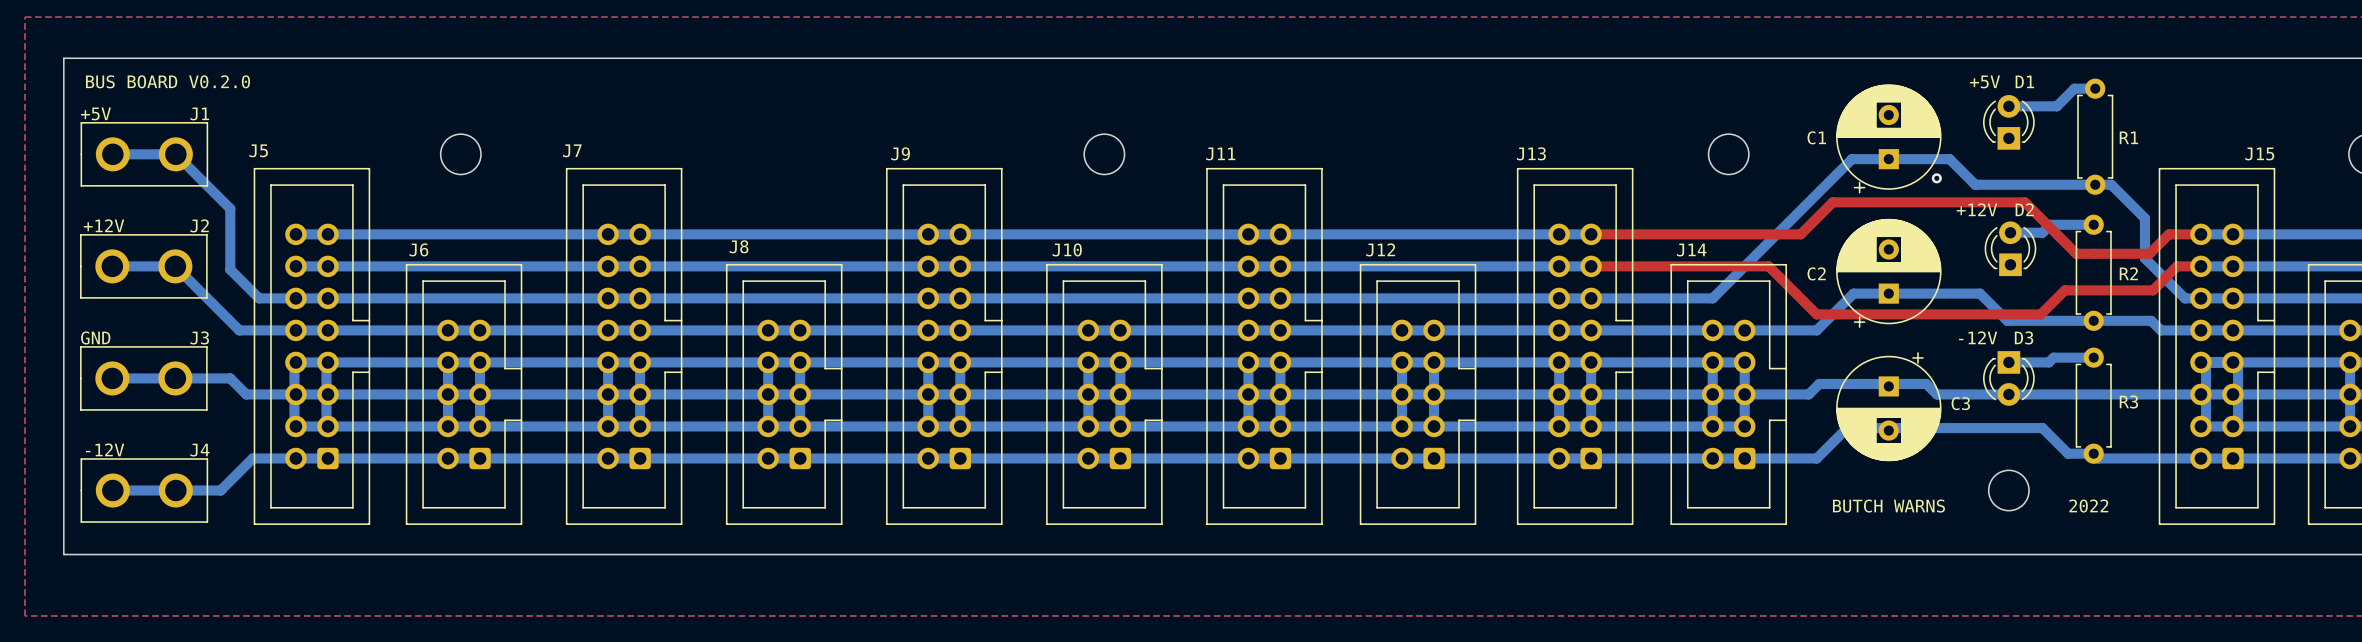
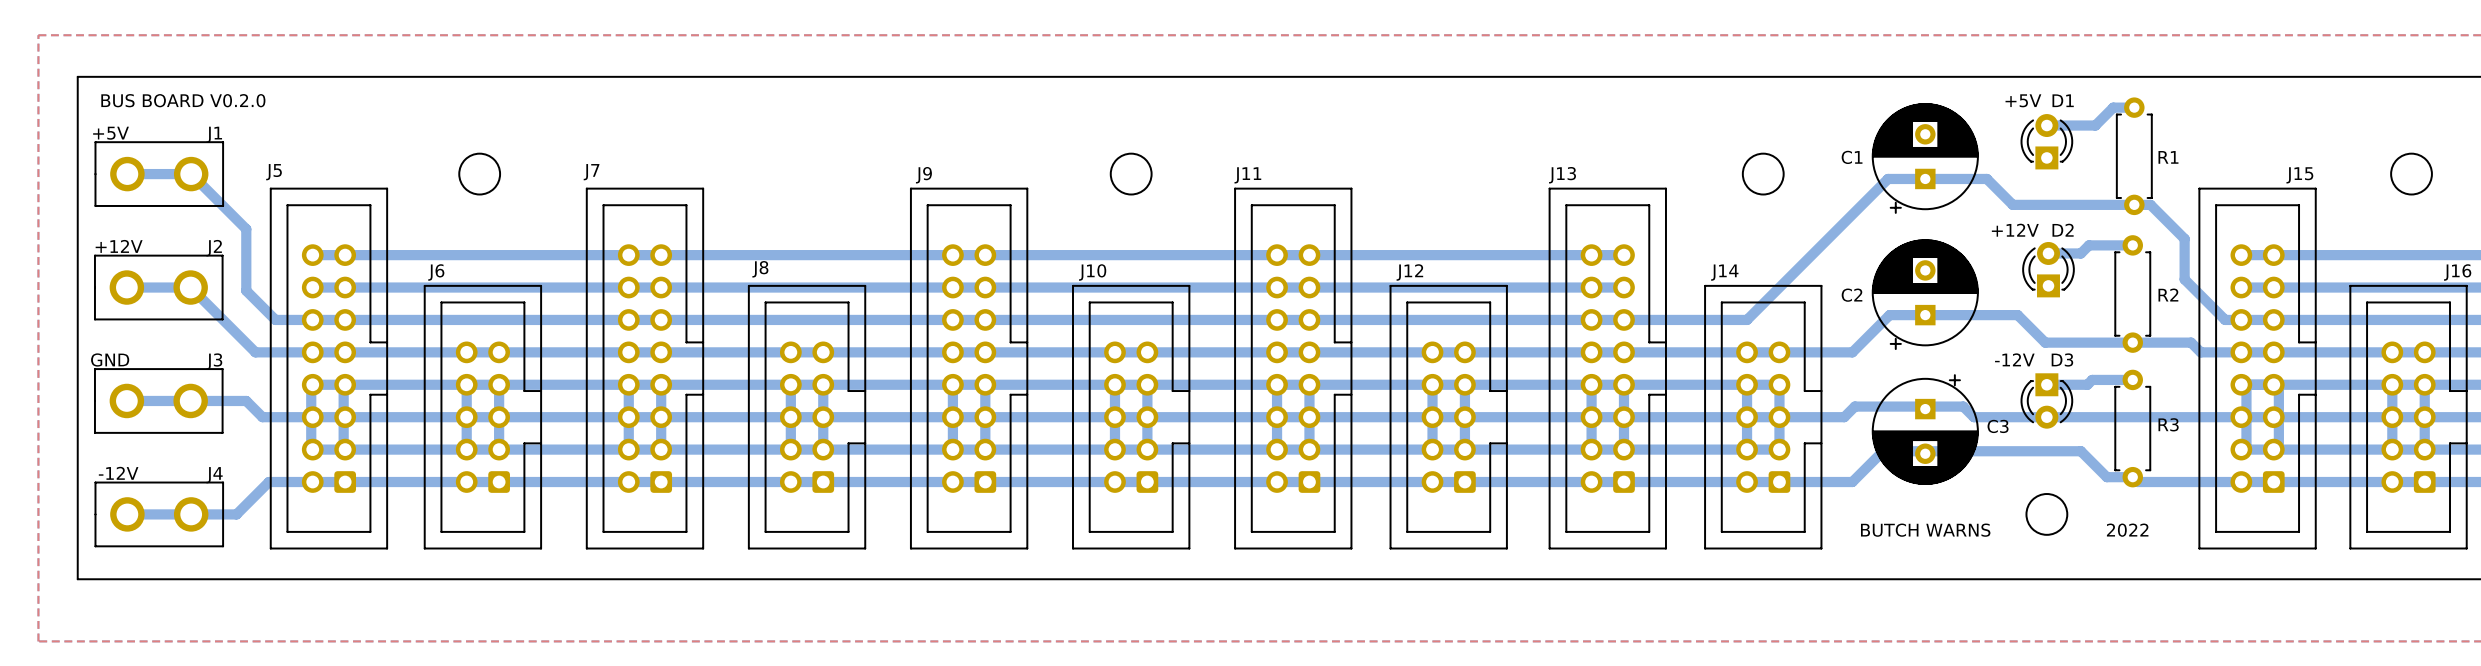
via: (1936, 178) -> none
top track: (1591, 234) (1800, 234) (1832, 202) (2024, 202) (2076, 253) (2149, 253) (2168, 234) (2200, 234) -> none
top track: (1591, 266) (1768, 266) (1816, 314) (2040, 314) (2064, 290) (2152, 290) (2176, 266) (2200, 266) -> none

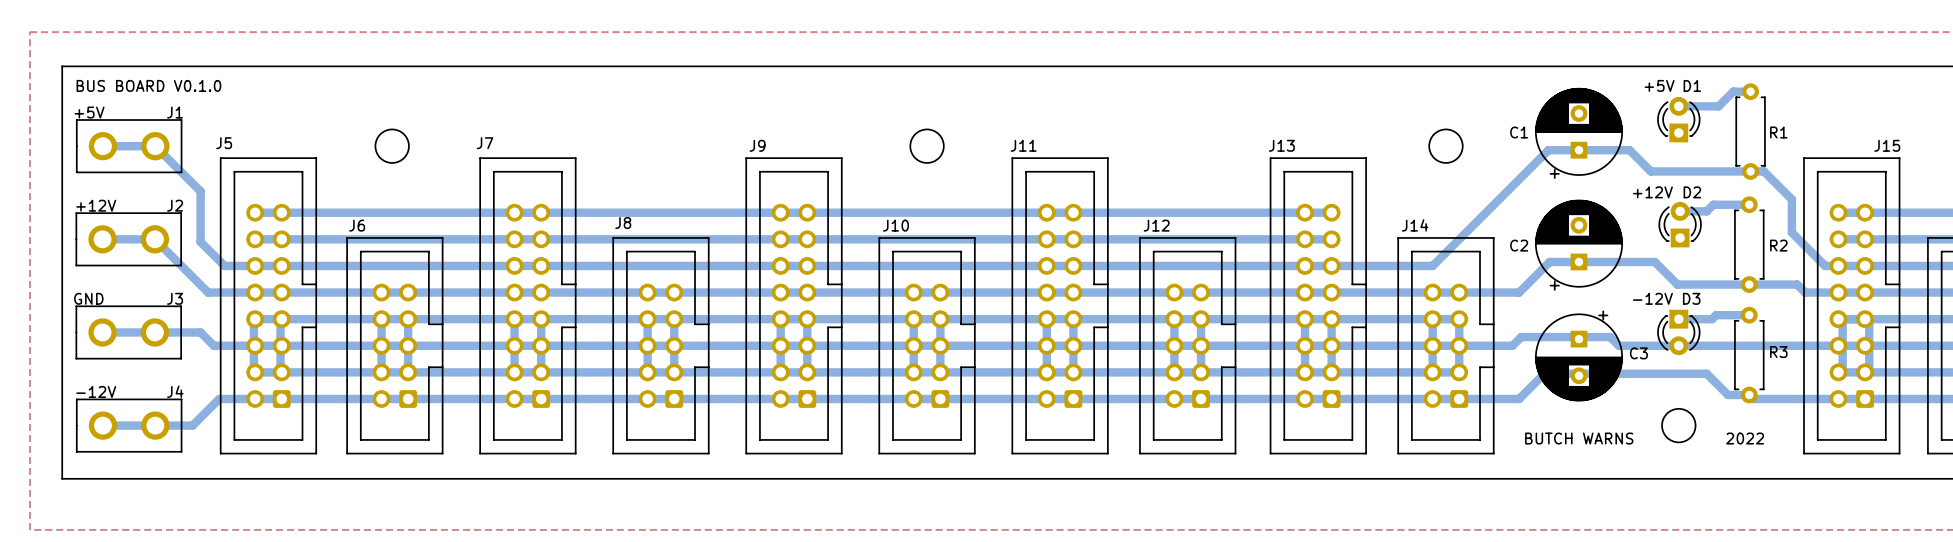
text: BUS BOARD V0.2.0 (183, 100) -> BUS BOARD V0.1.0 (148, 85)

